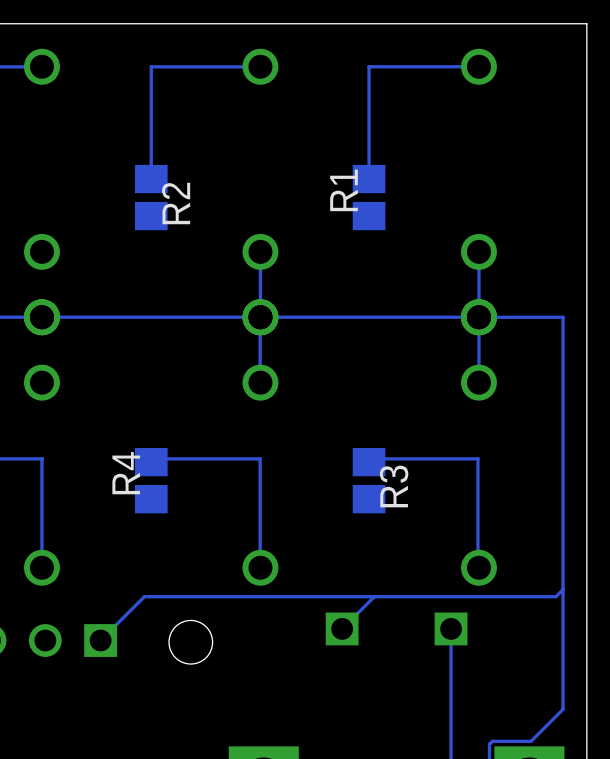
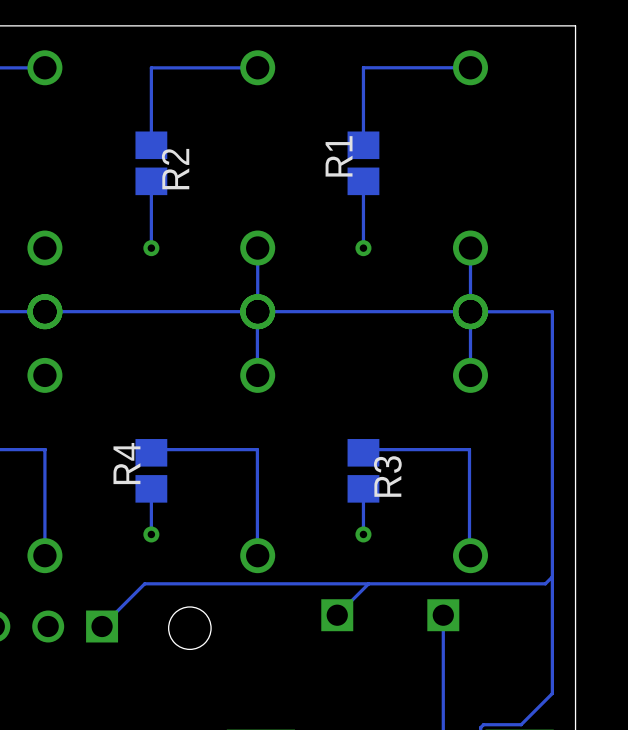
track: (151, 146) (151, 179) -> none
track: (369, 146) (369, 179) -> none
track: none -> (151, 181) (151, 248)
track: none -> (363, 181) (363, 248)
R2 position: (151, 197) -> (151, 163)
R1 position: (369, 197) -> (363, 163)
via: none -> (151, 248)
via: none -> (363, 248)
track: none -> (151, 488) (151, 534)
track: none -> (363, 488) (363, 534)
via: none -> (151, 534)
via: none -> (363, 534)

